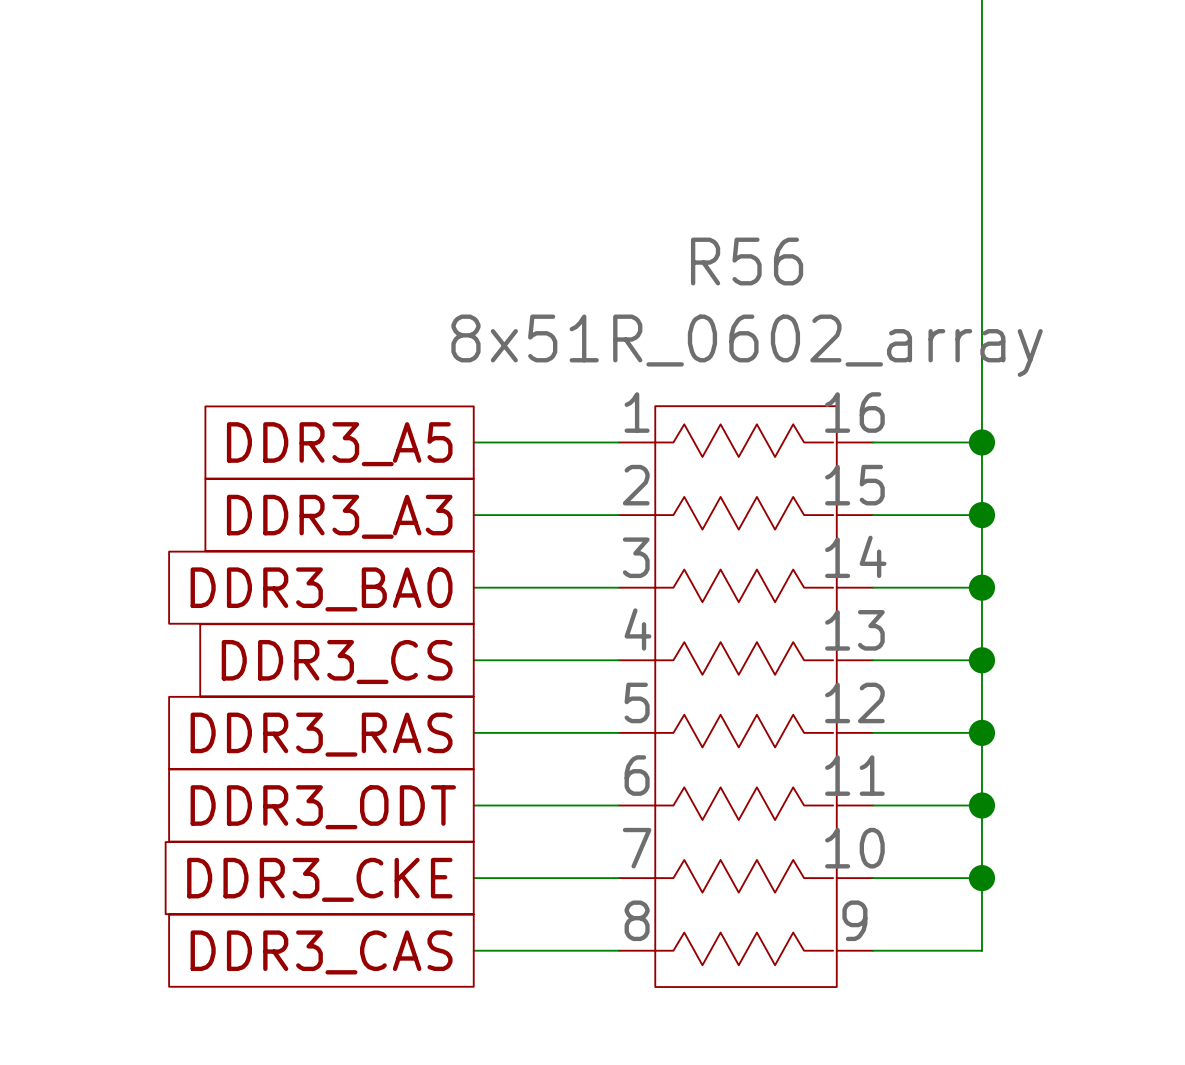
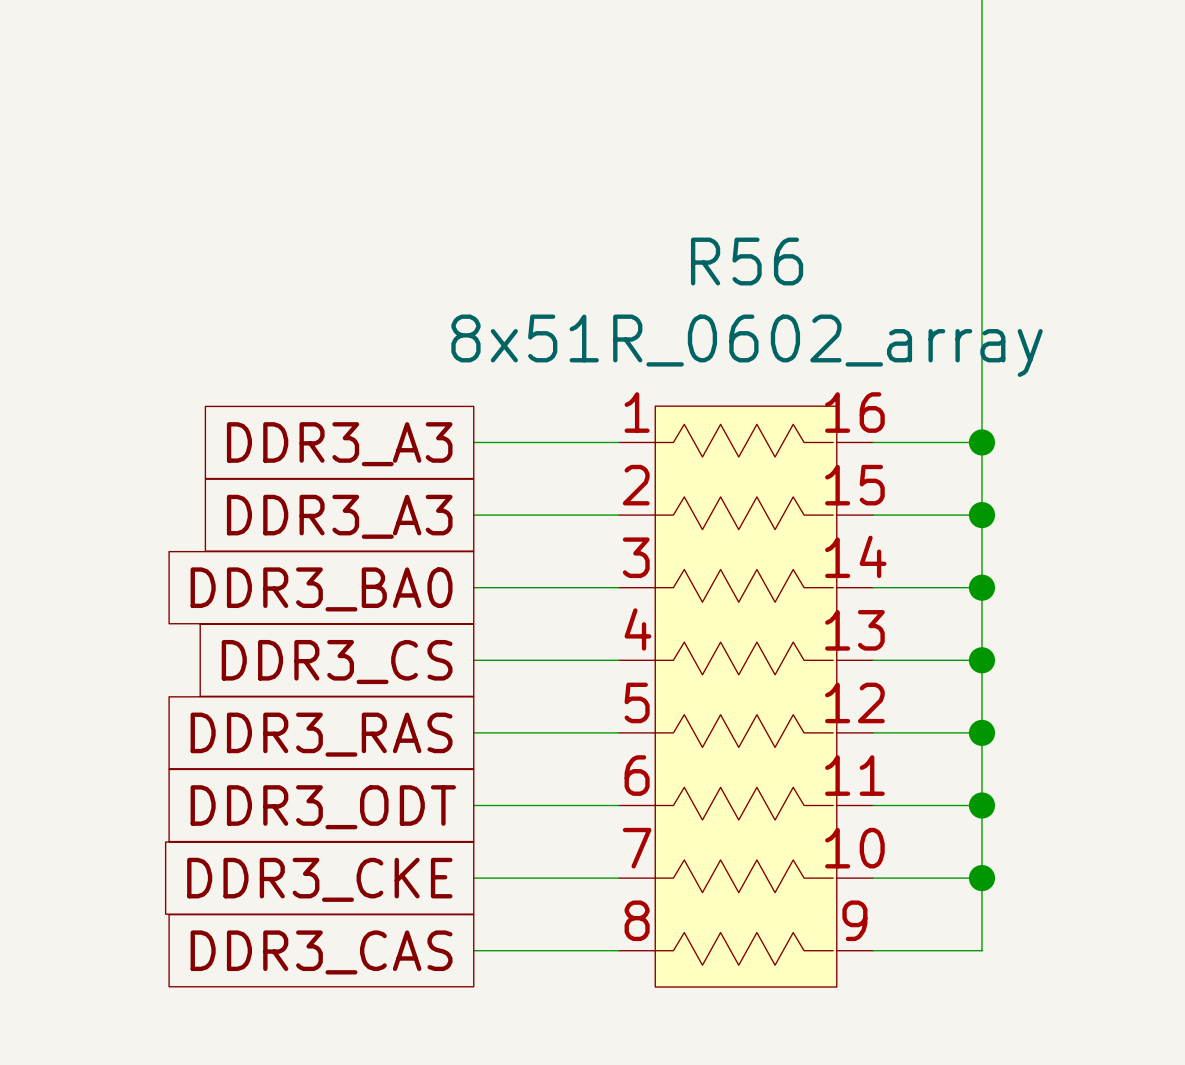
global label: DDR3_A5 (339, 444) -> DDR3_A3 (339, 444)

